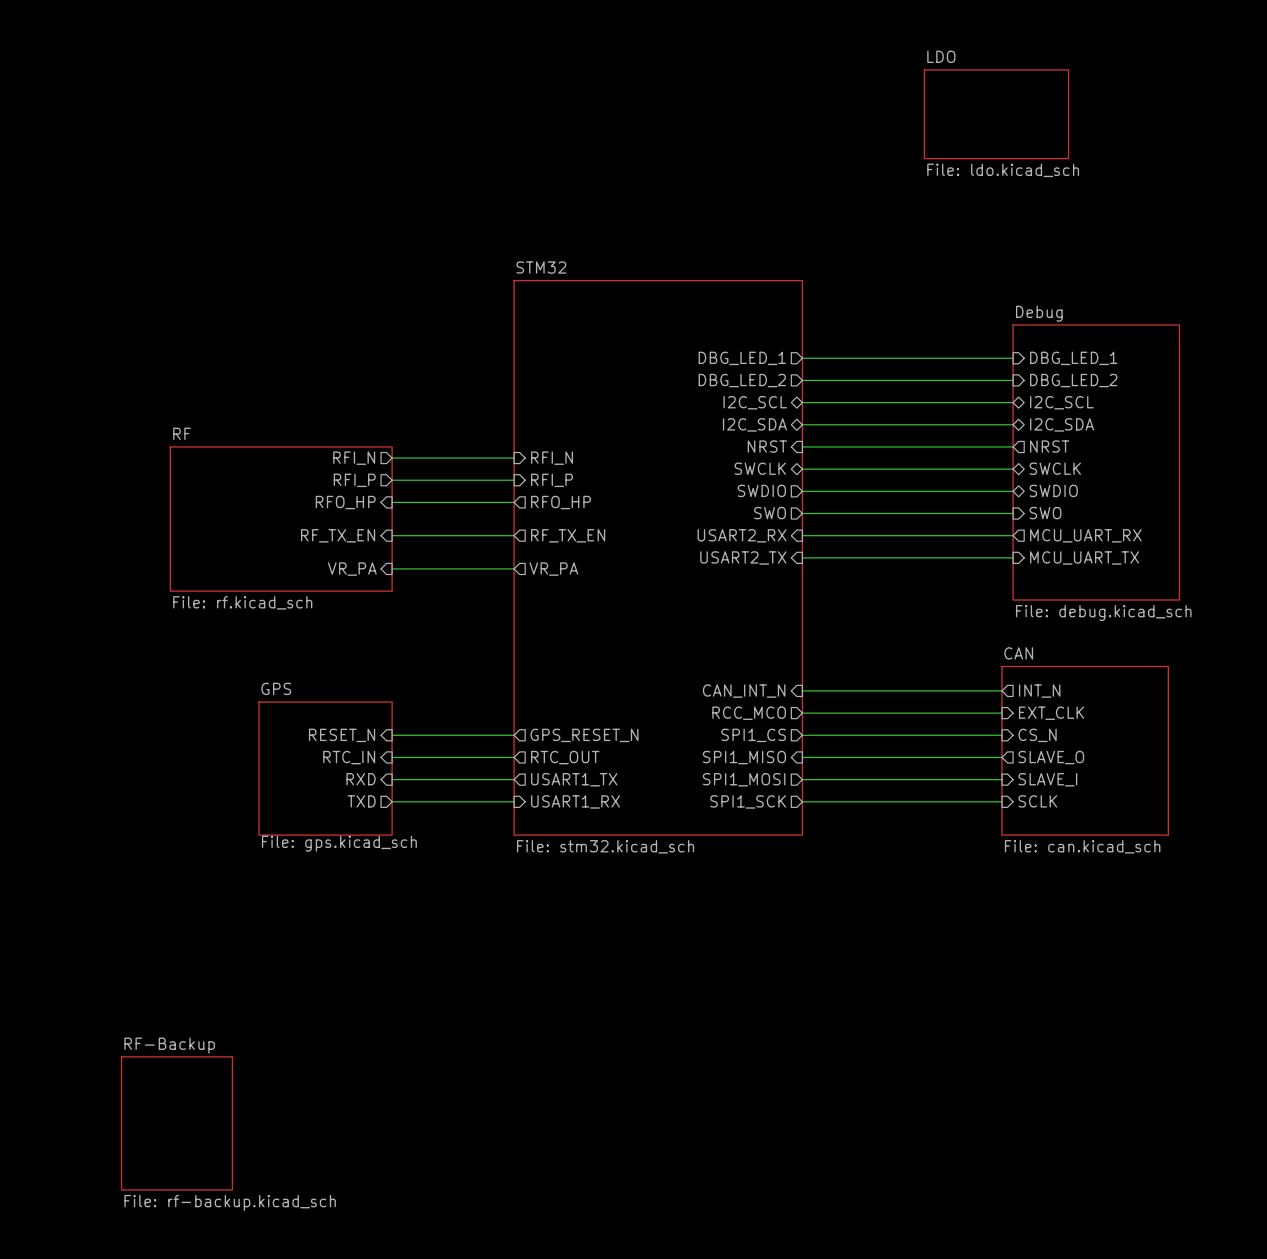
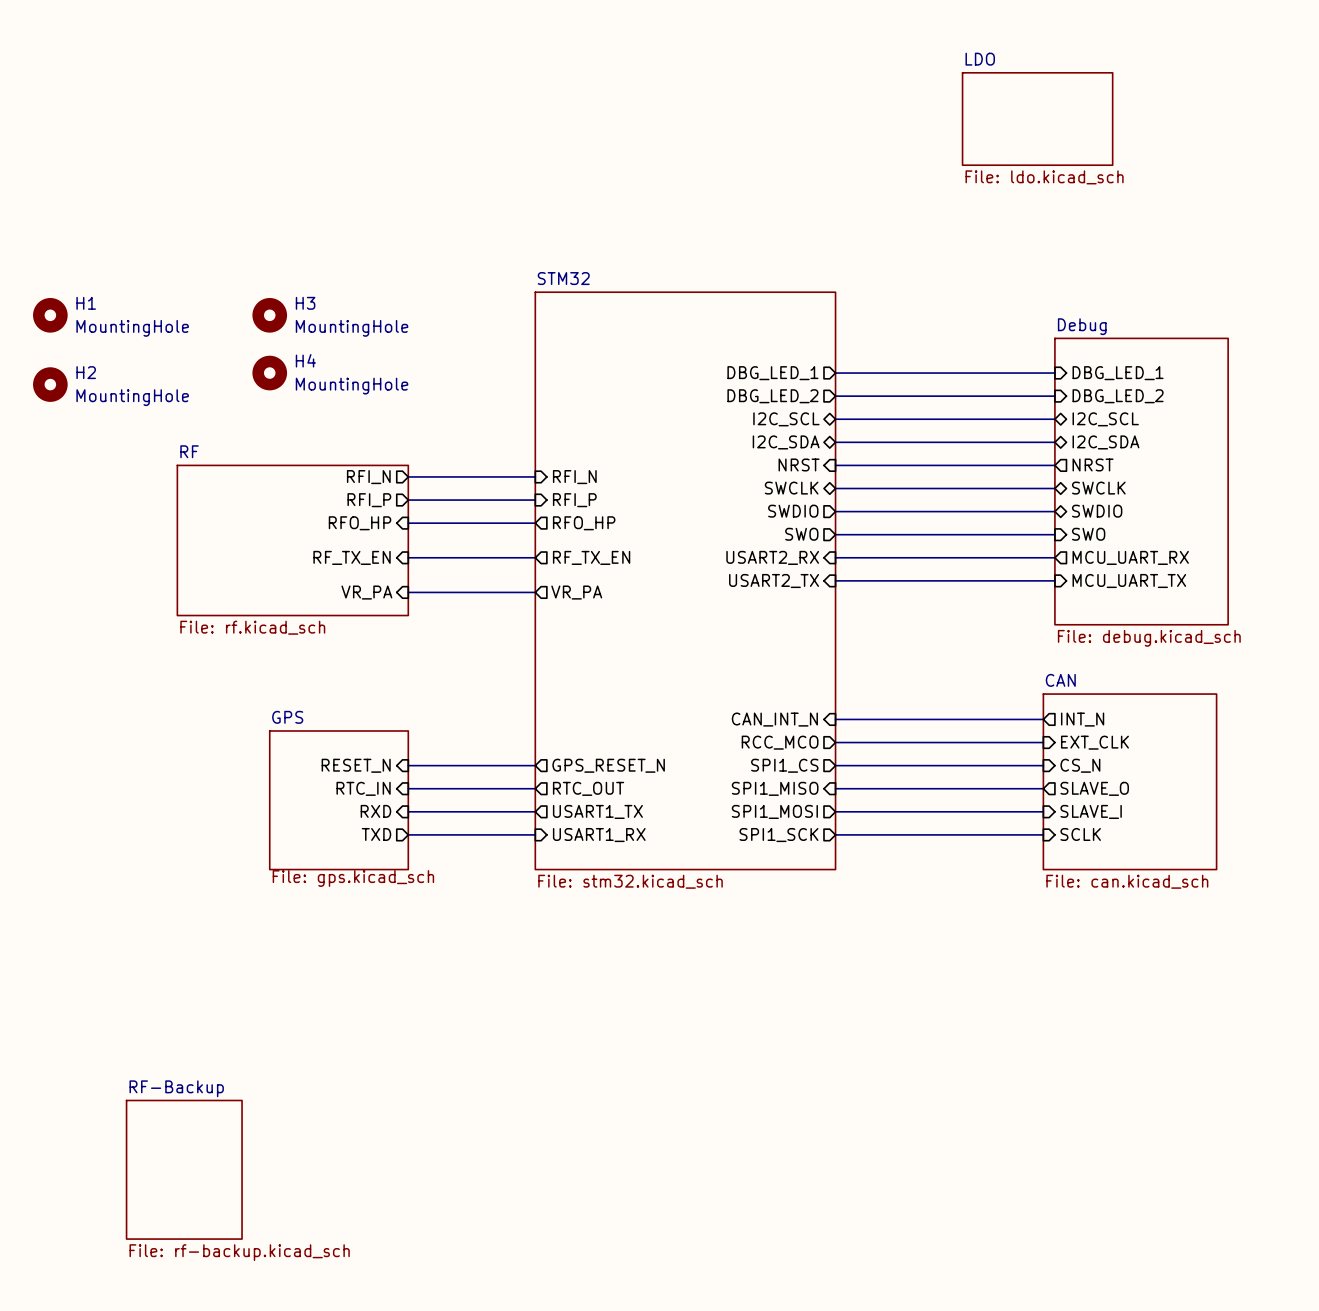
H1: none -> MountingHole (50, 315)
H3: none -> MountingHole (269, 315)
H4: none -> MountingHole (269, 373)
H2: none -> MountingHole (50, 384)

